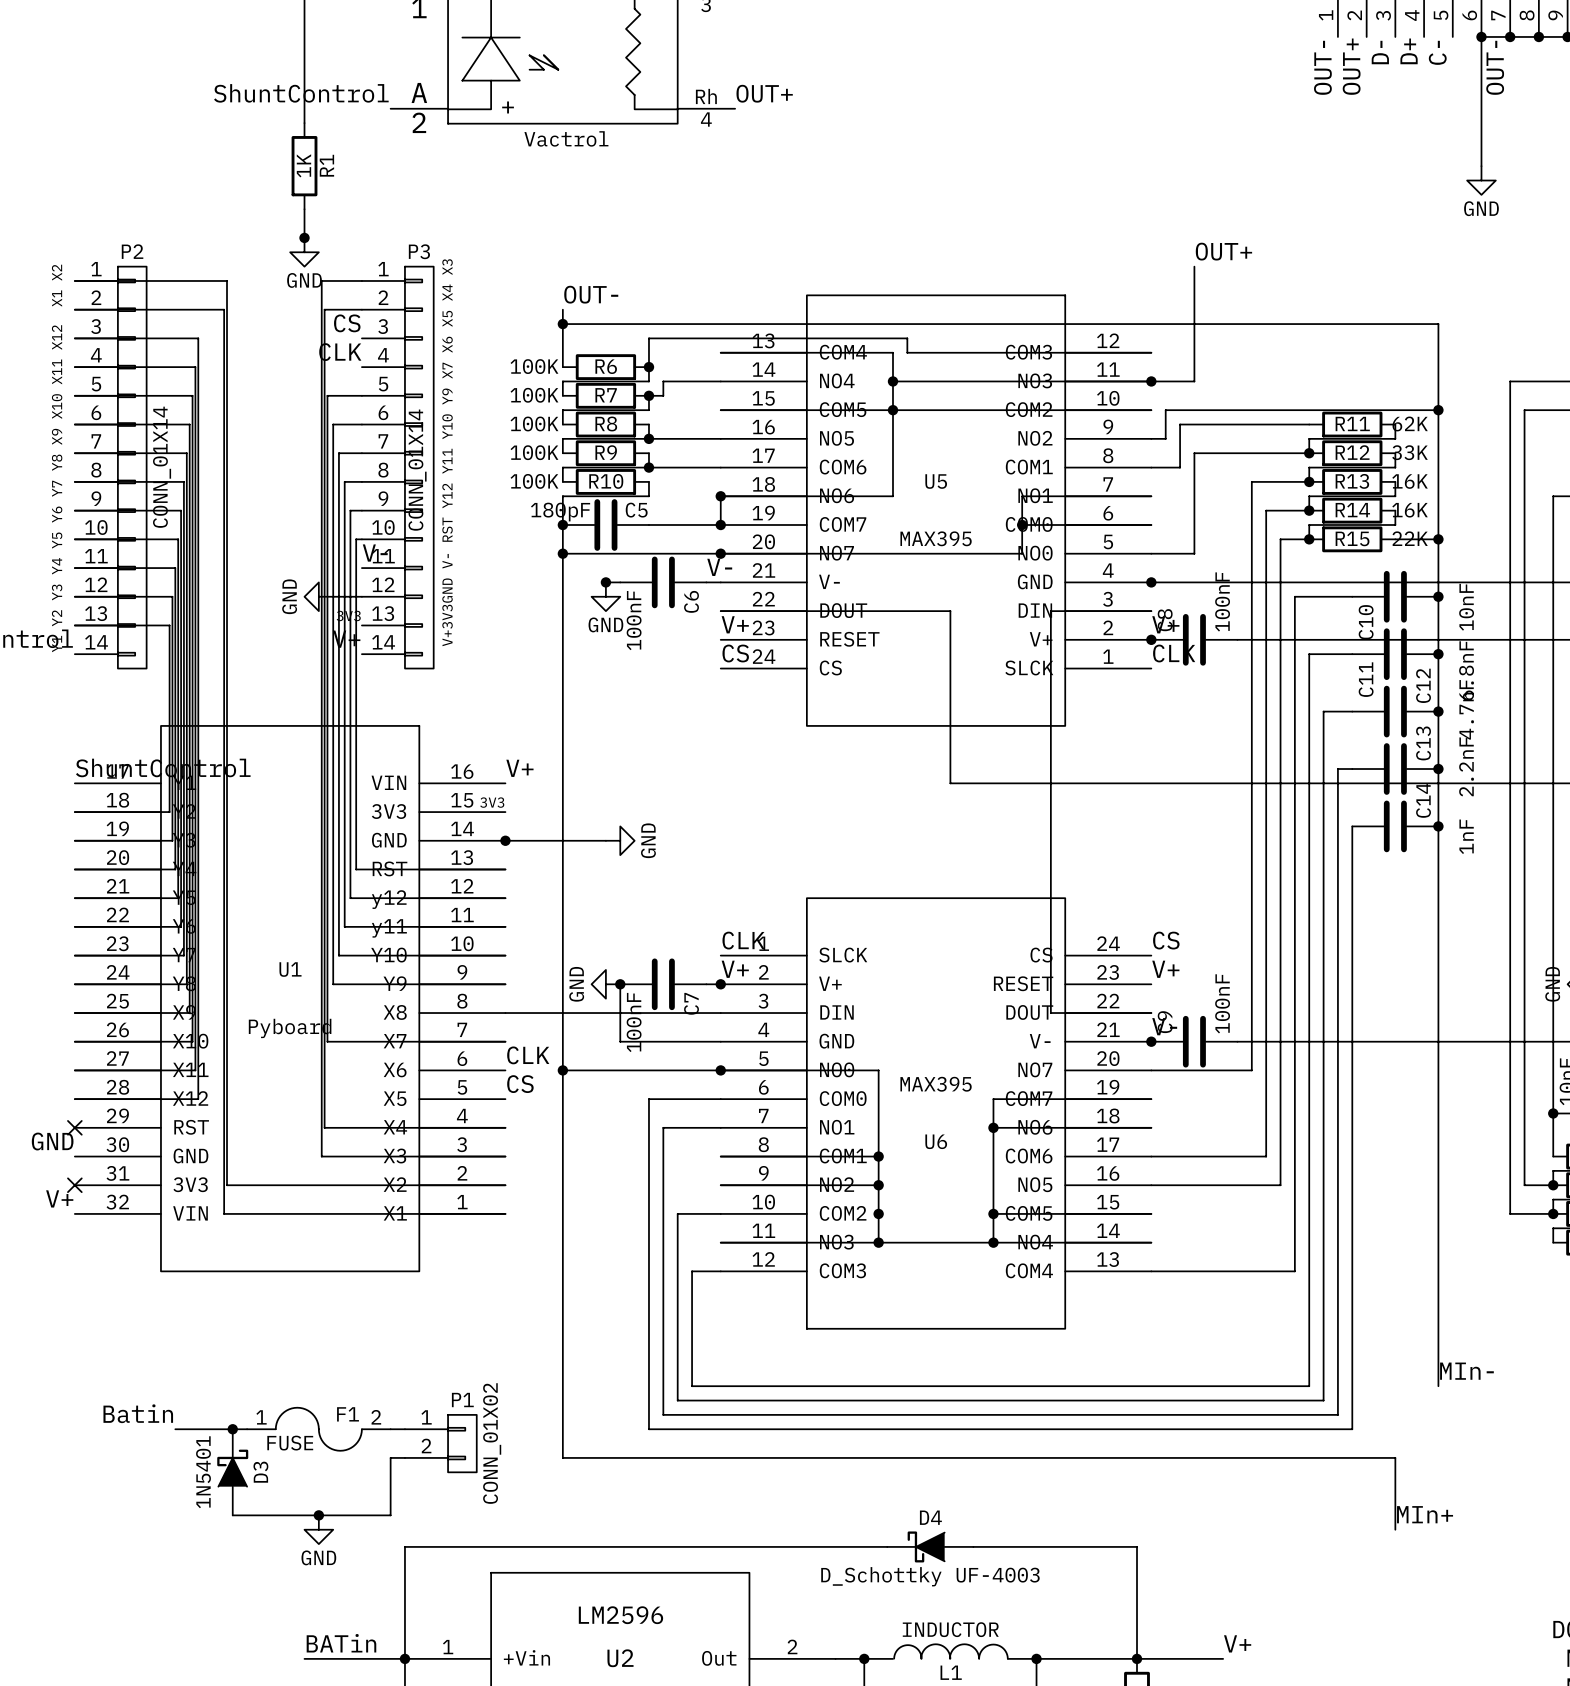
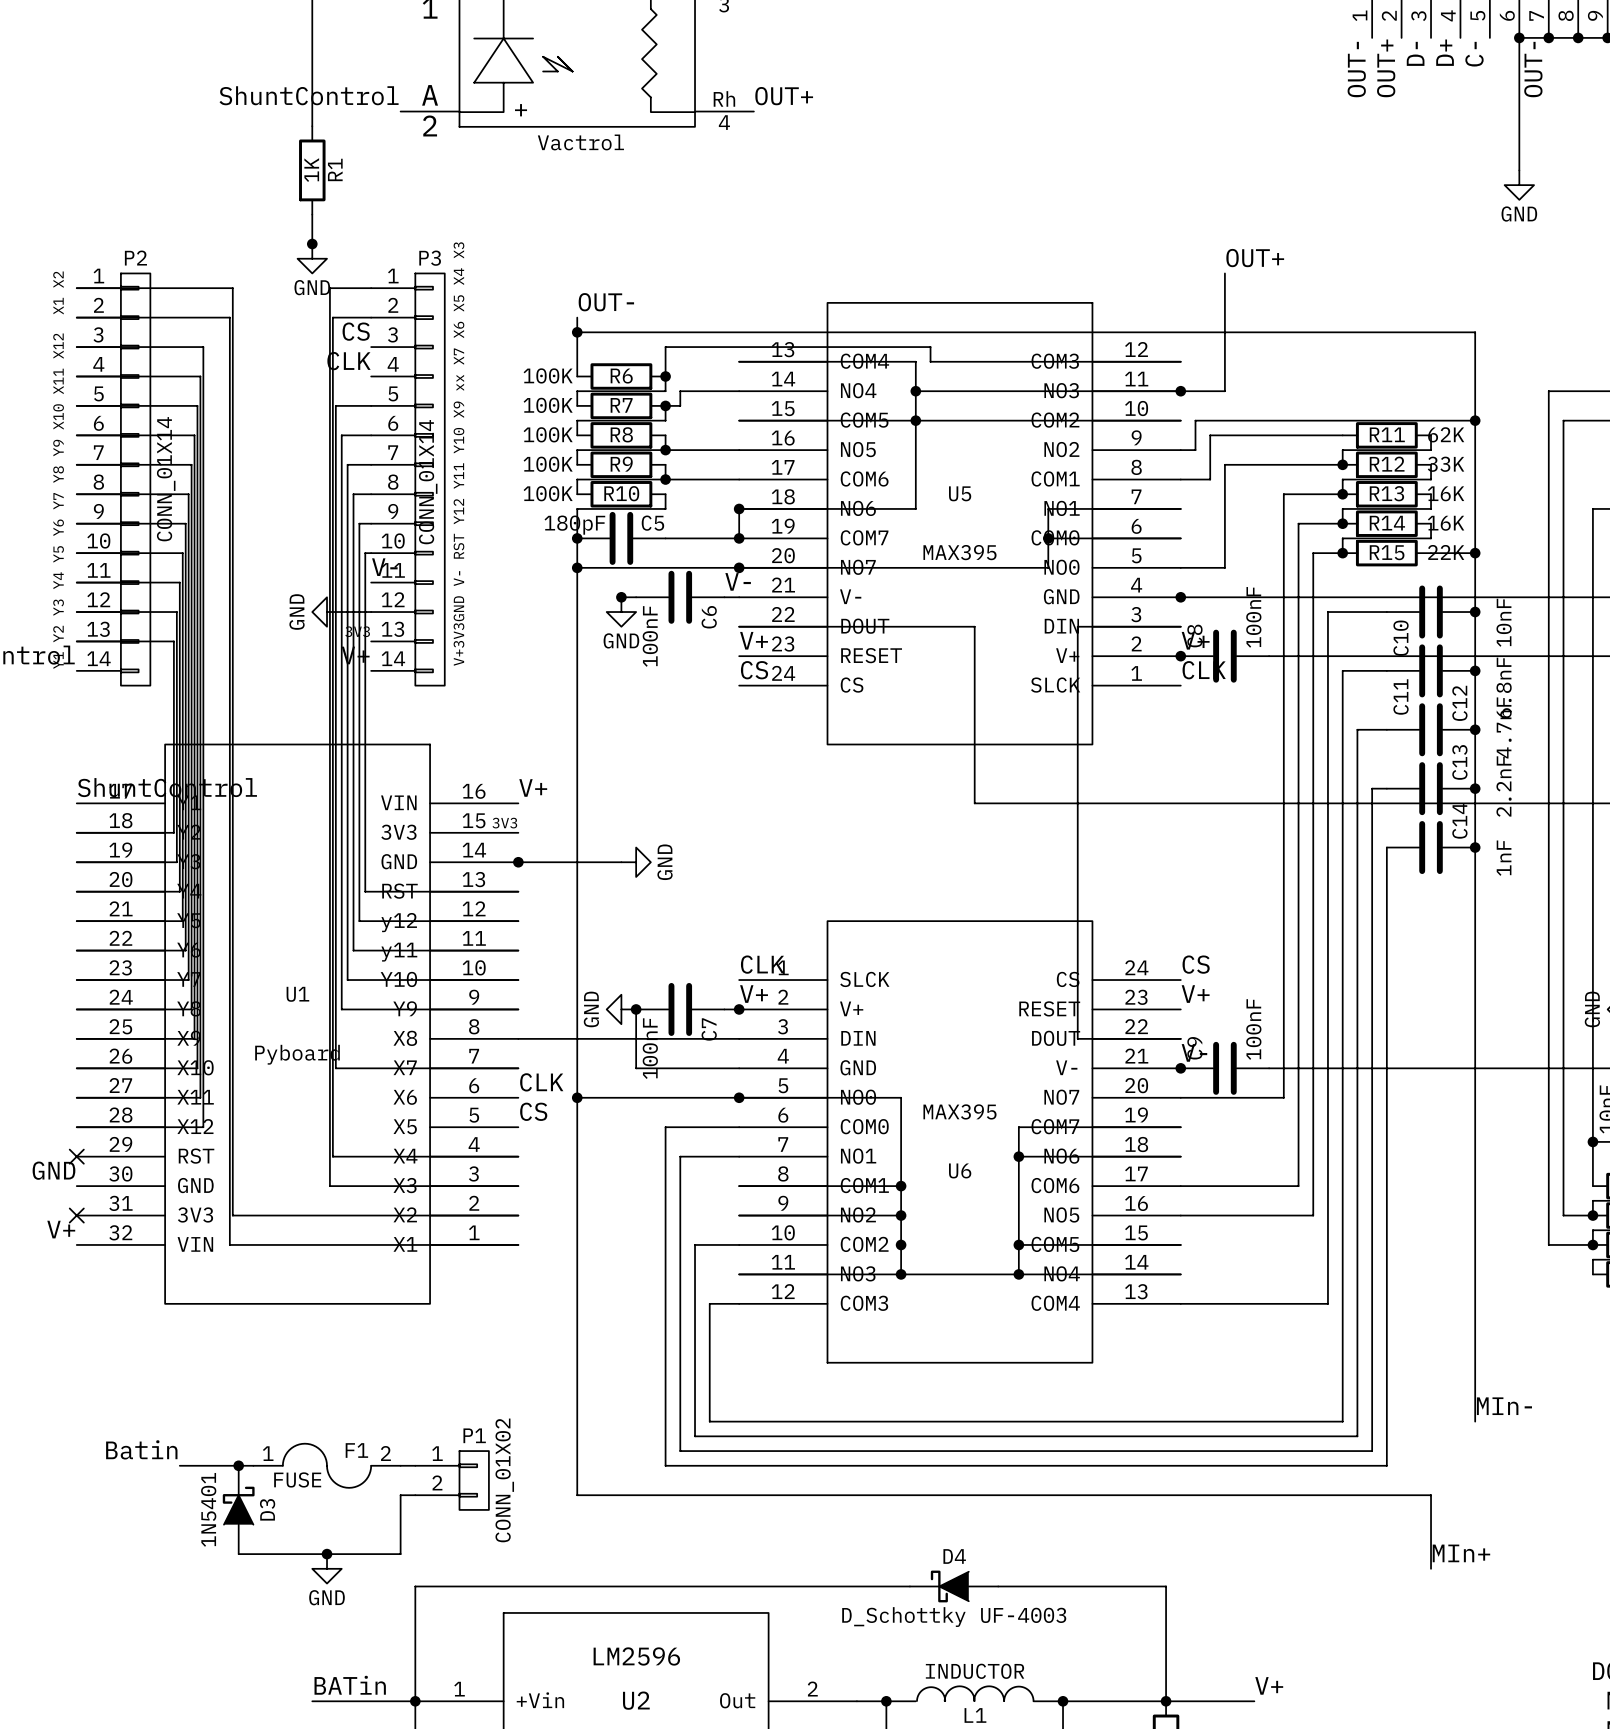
text: V+3V3GND V- RST Y12 Y11 Y10 Y9 X7 X6 X5 X4 X3 (447, 452) -> V+3V3GND V- RST Y12 Y11 Y10 X9 xx X7 X6 X5 X4 X3 (458, 454)
text: Y1 Y2 Y3 Y4 Y5 Y6 Y7 Y8 X9 X10 X11 X12 X1 X2 (57, 458) -> Y1 Y2 Y3 Y4 Y5 Y6 Y7 Y8 Y9 X10 X11 X12 X1 X2 (58, 470)

